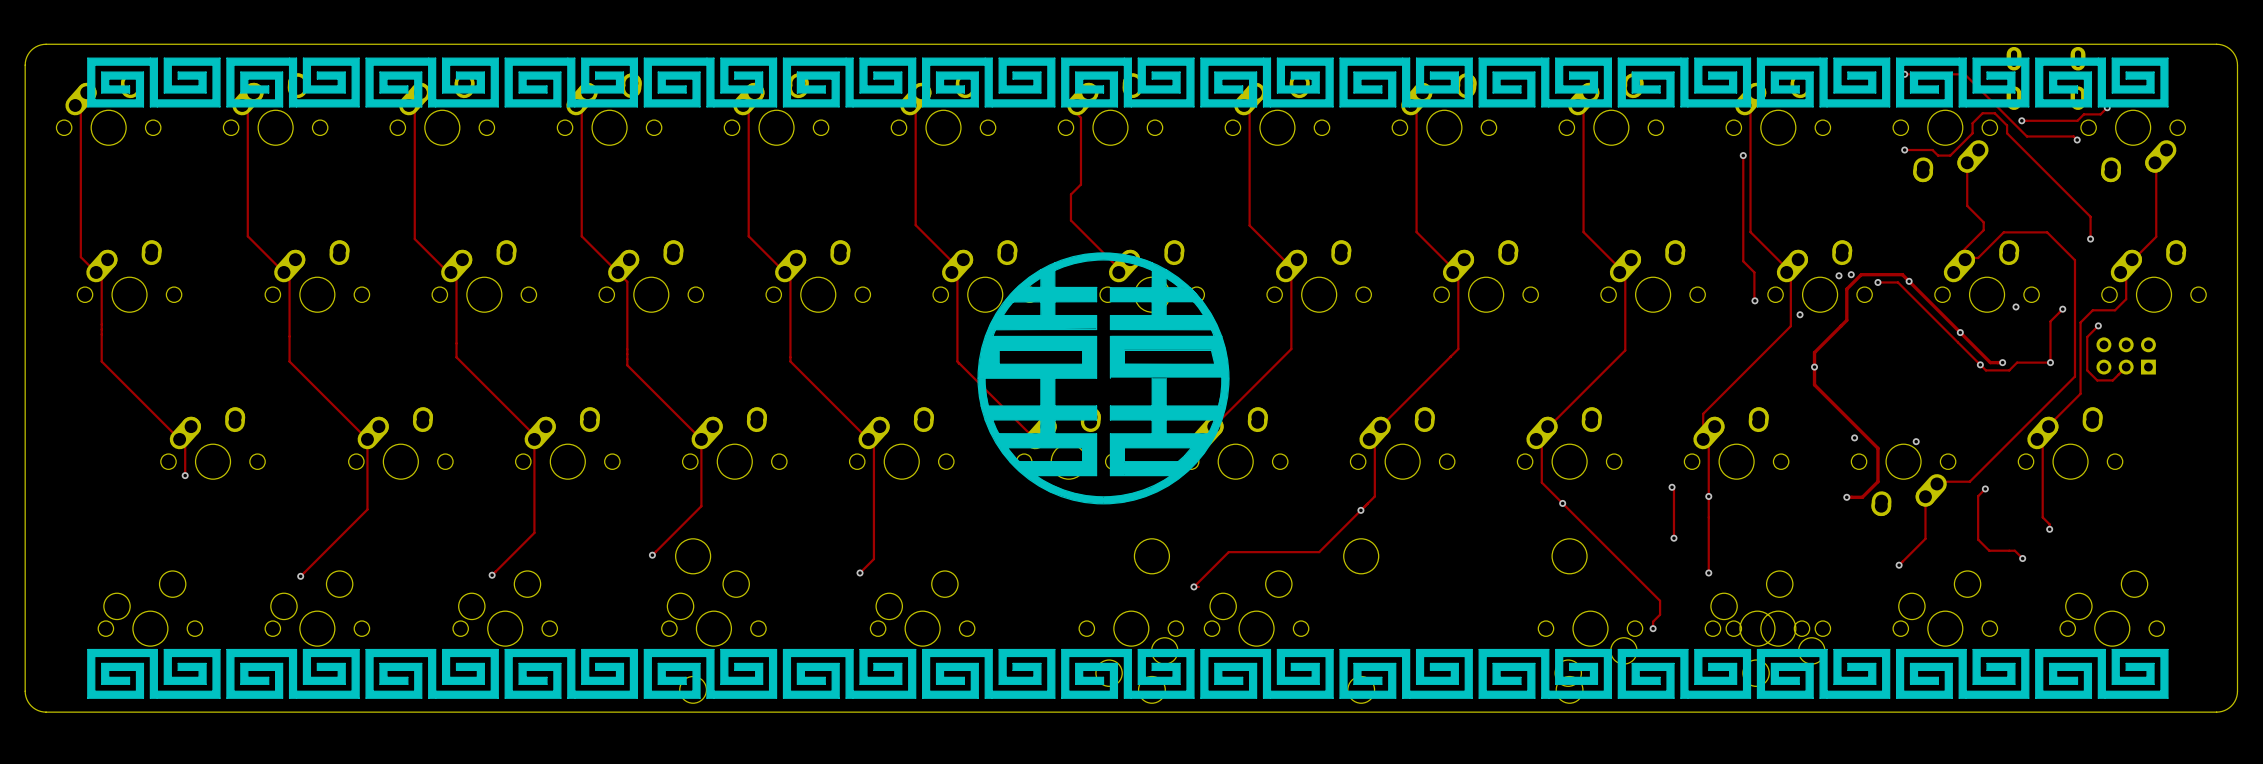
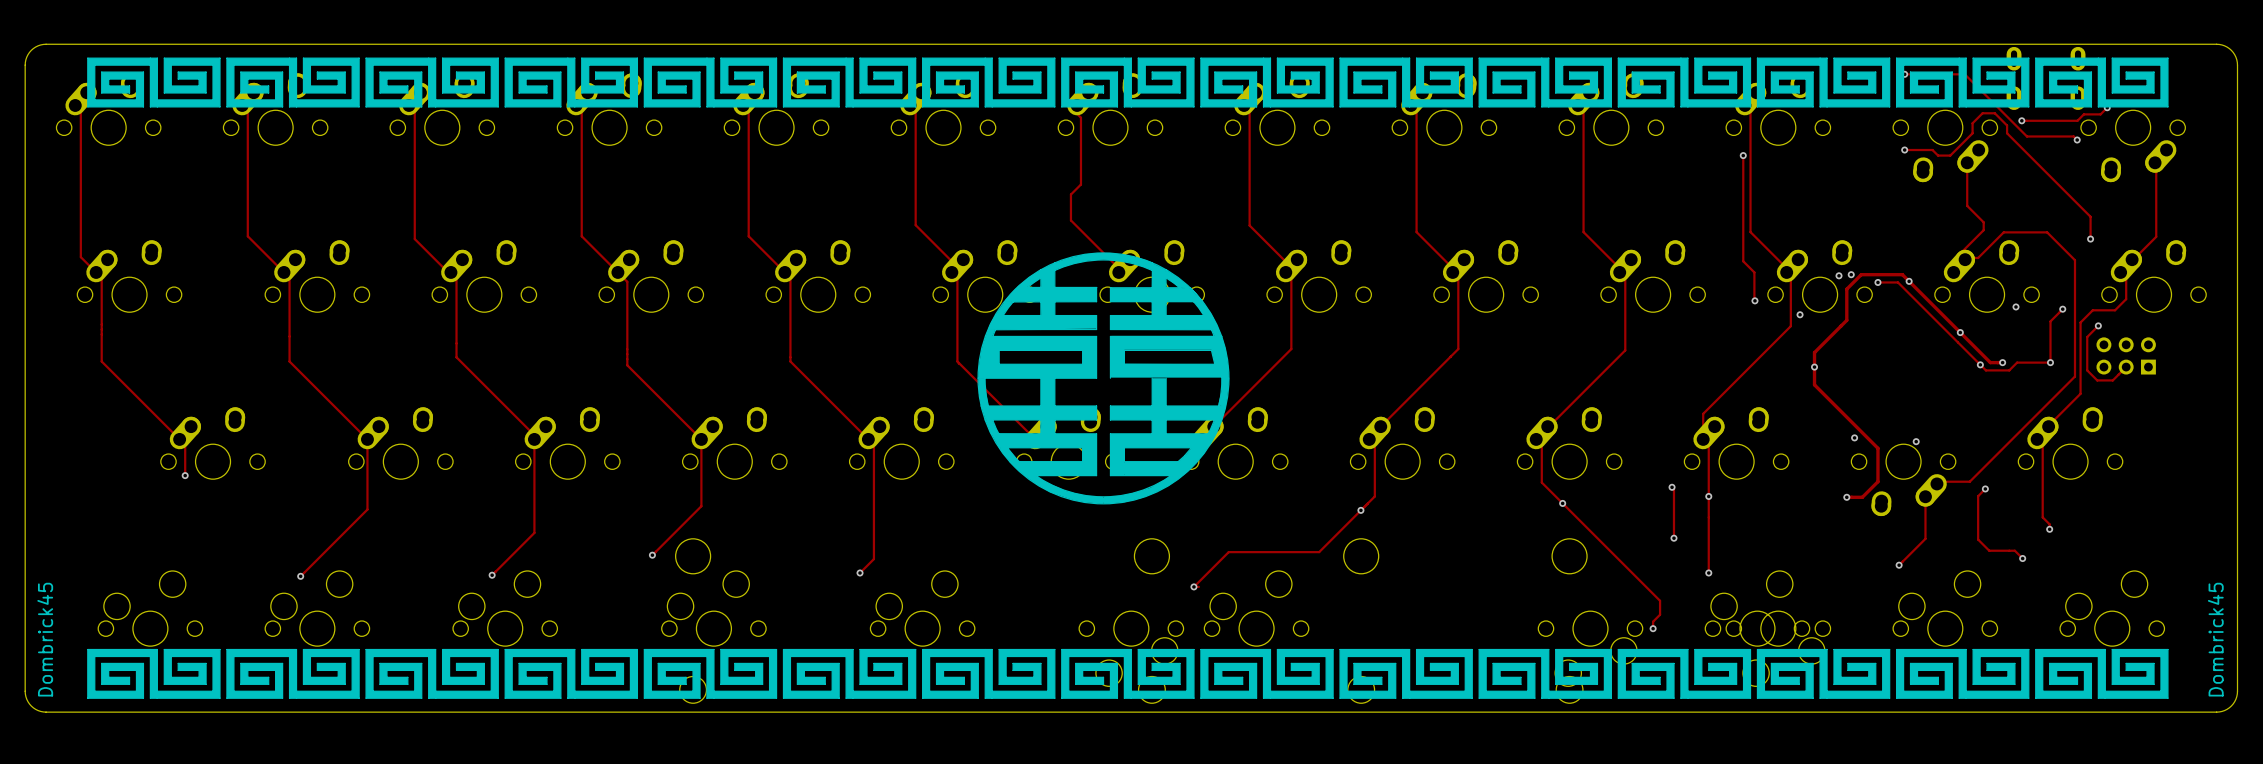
text: none -> Dombrick45 (45, 639)
text: none -> Dombrick45 (2215, 639)

